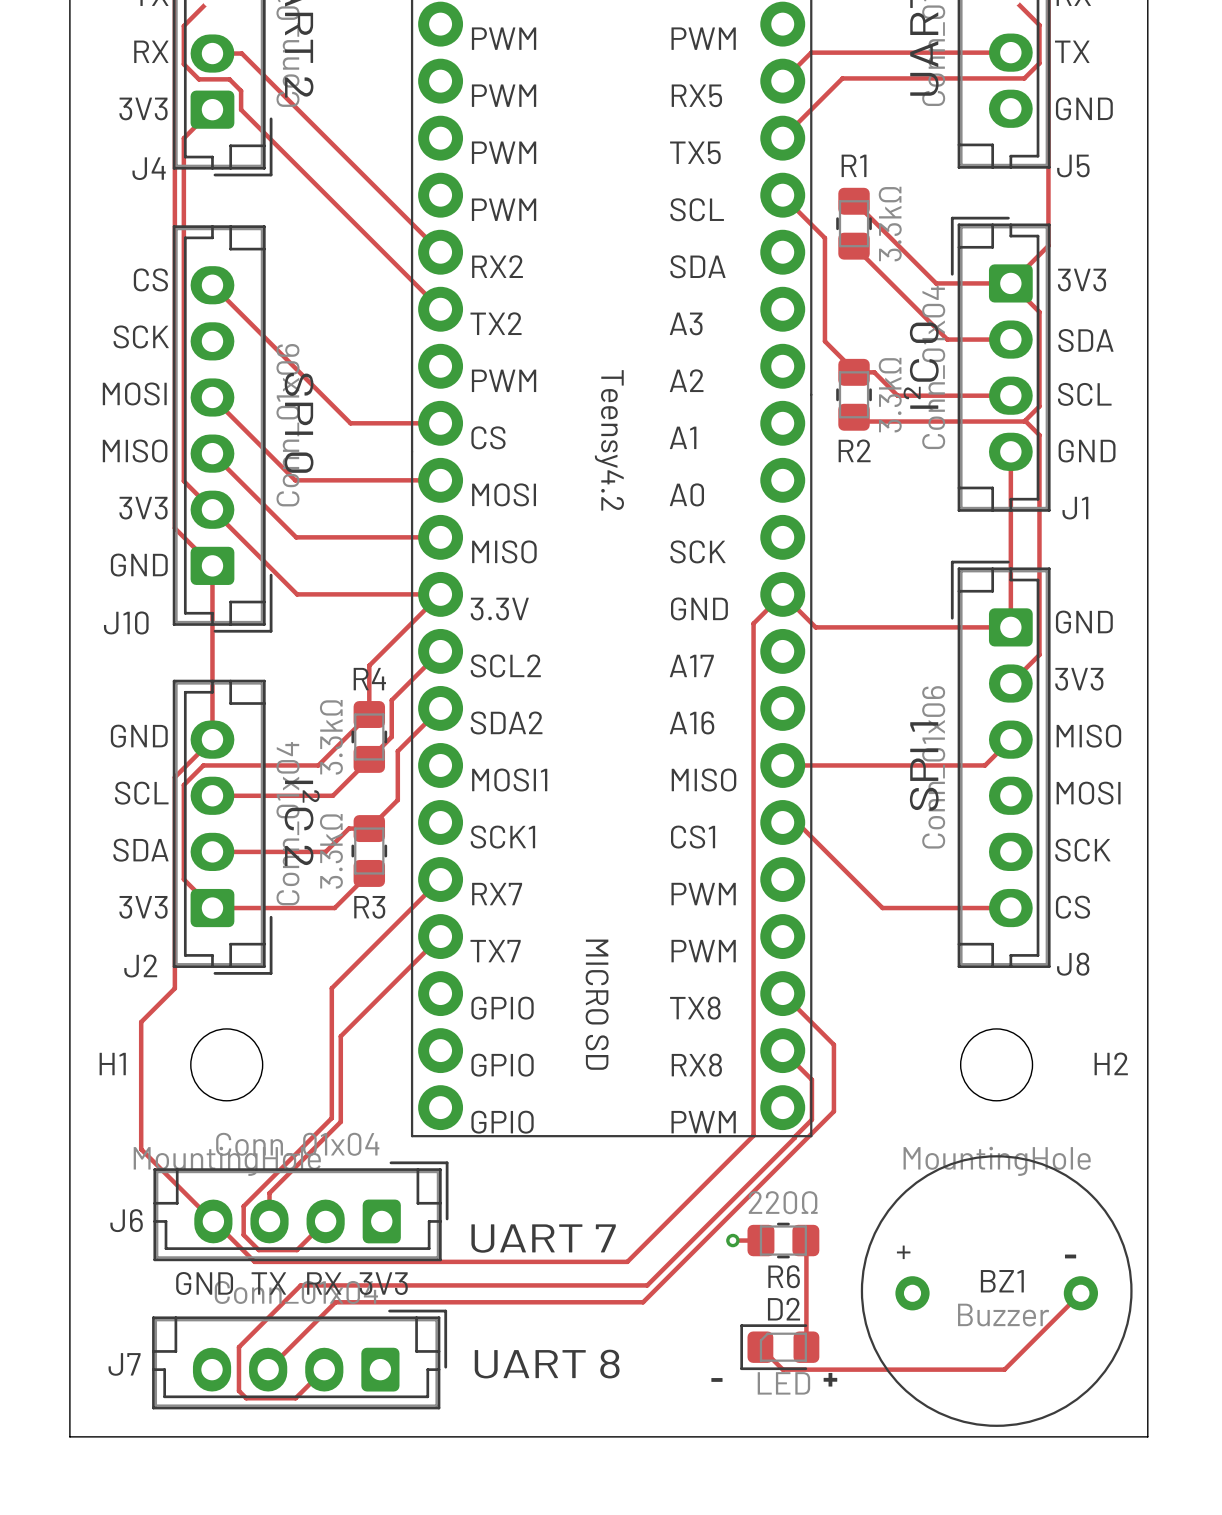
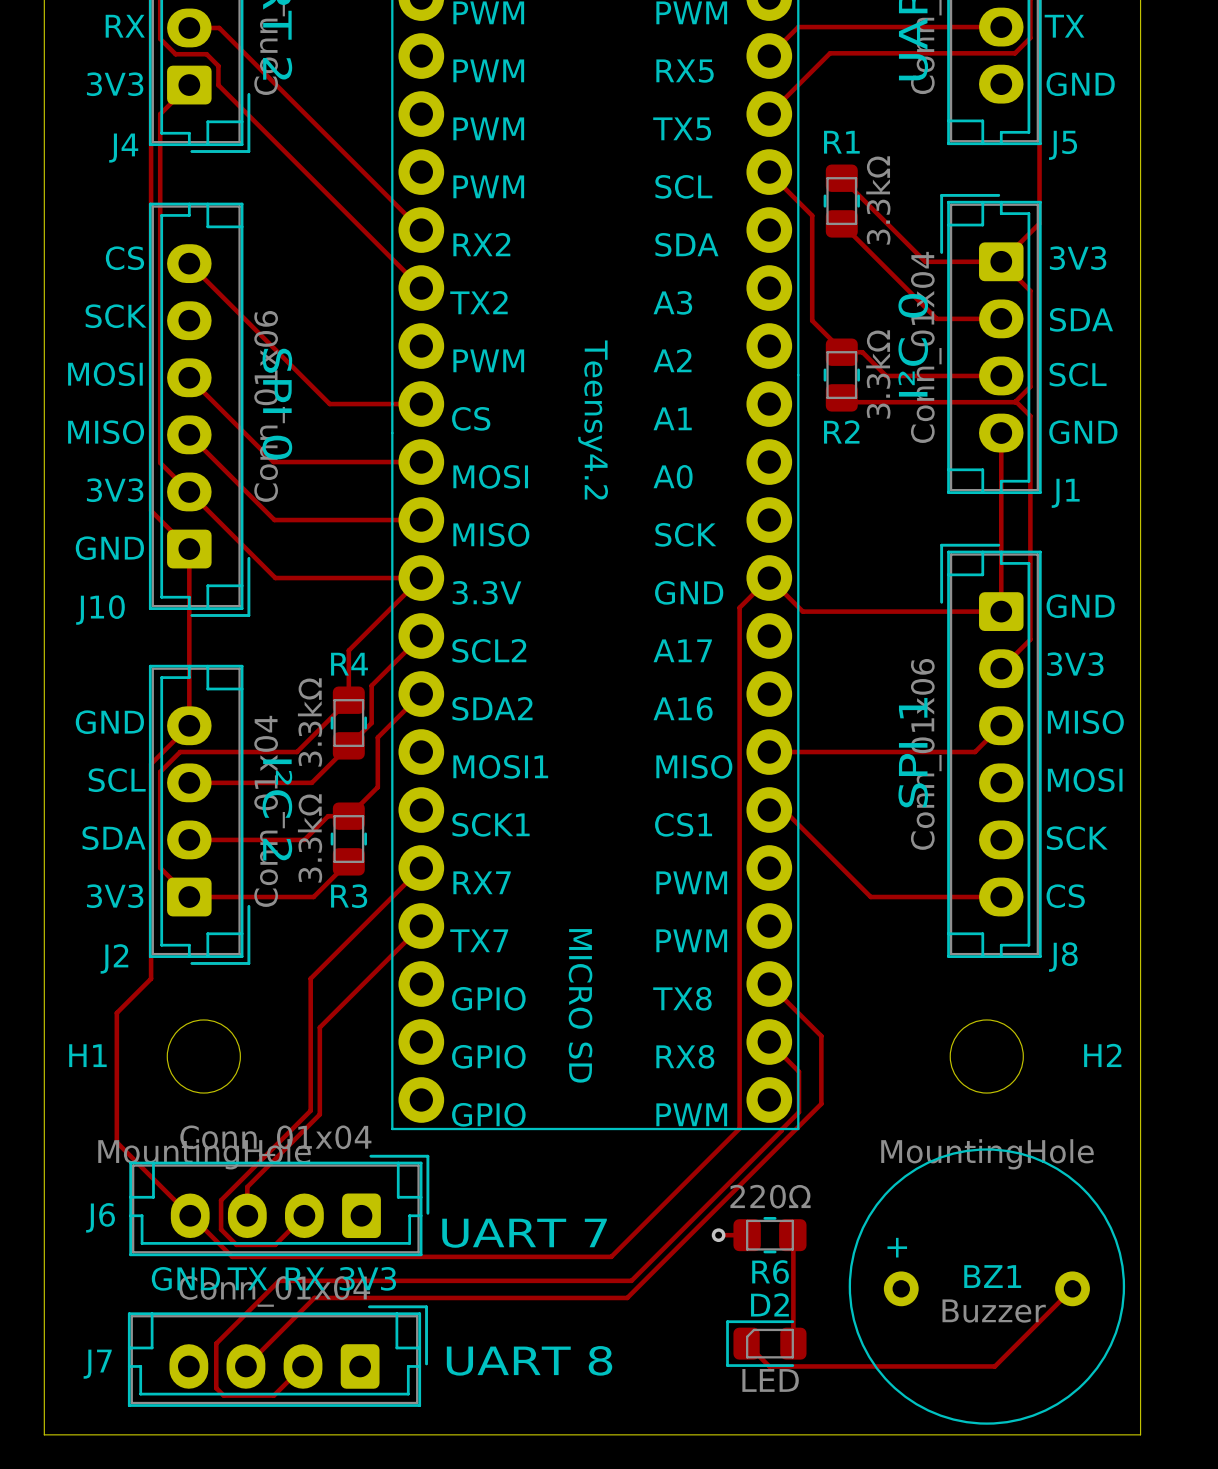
text: - (1070, 1256) -> none
text: - (716, 1379) -> none
text: + (830, 1379) -> none

